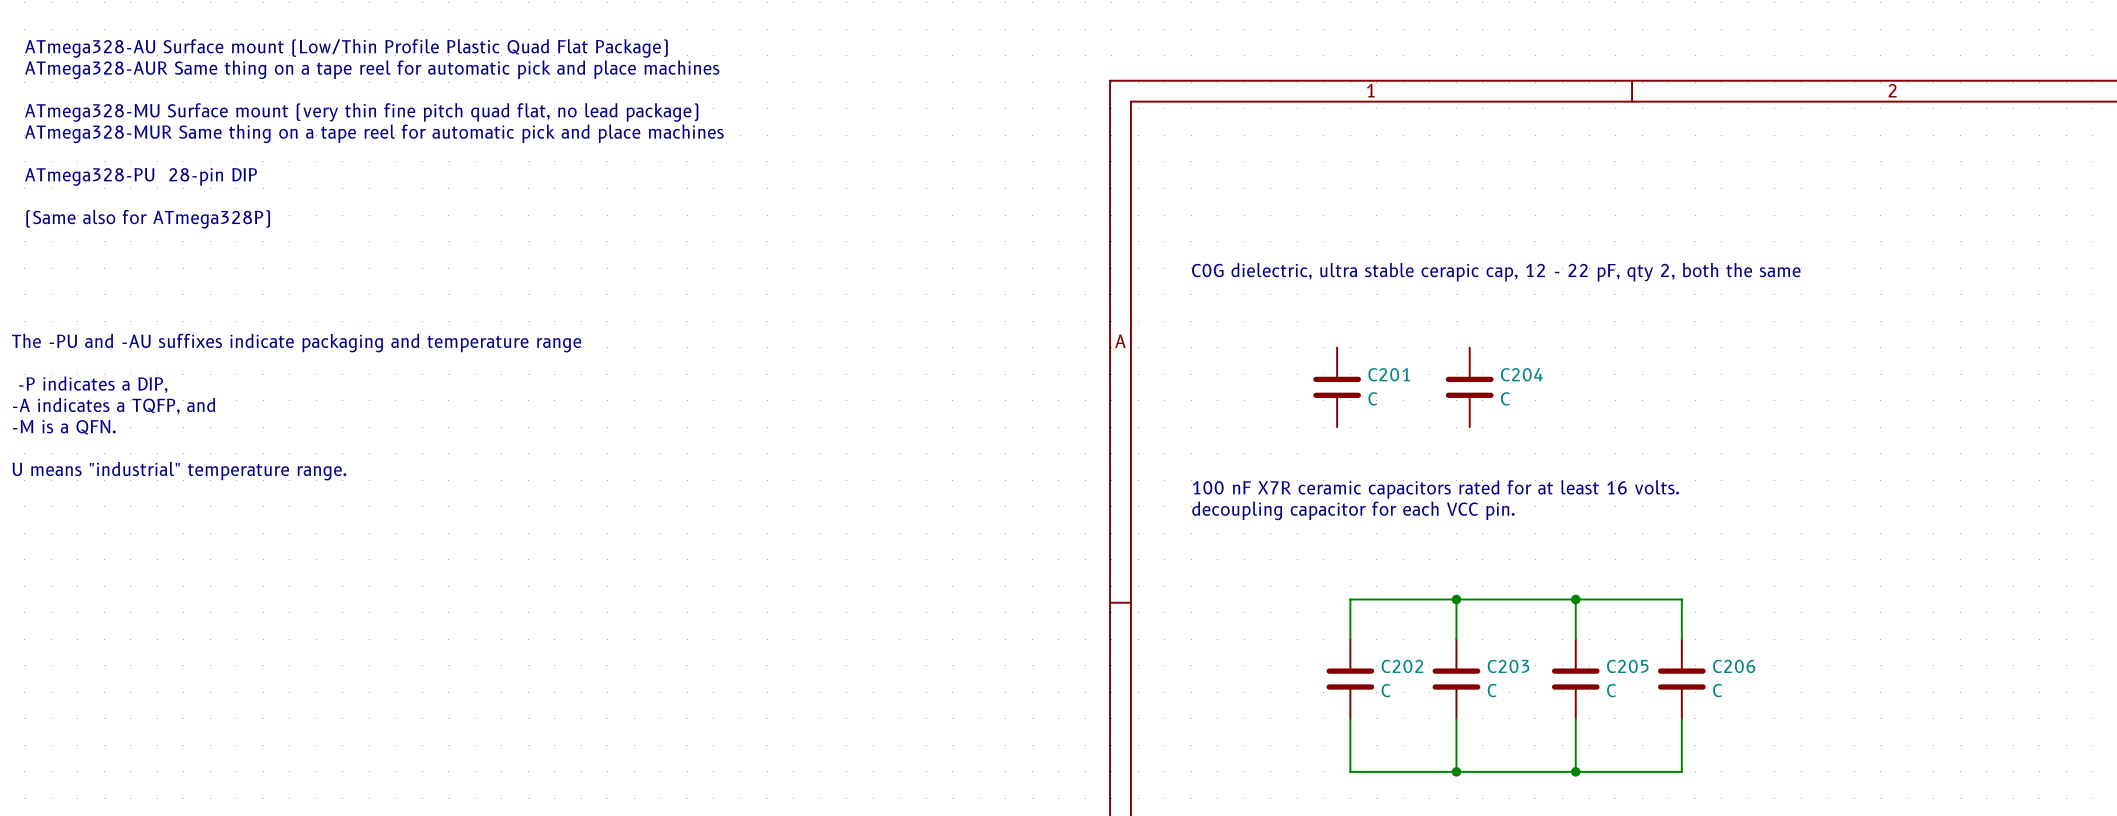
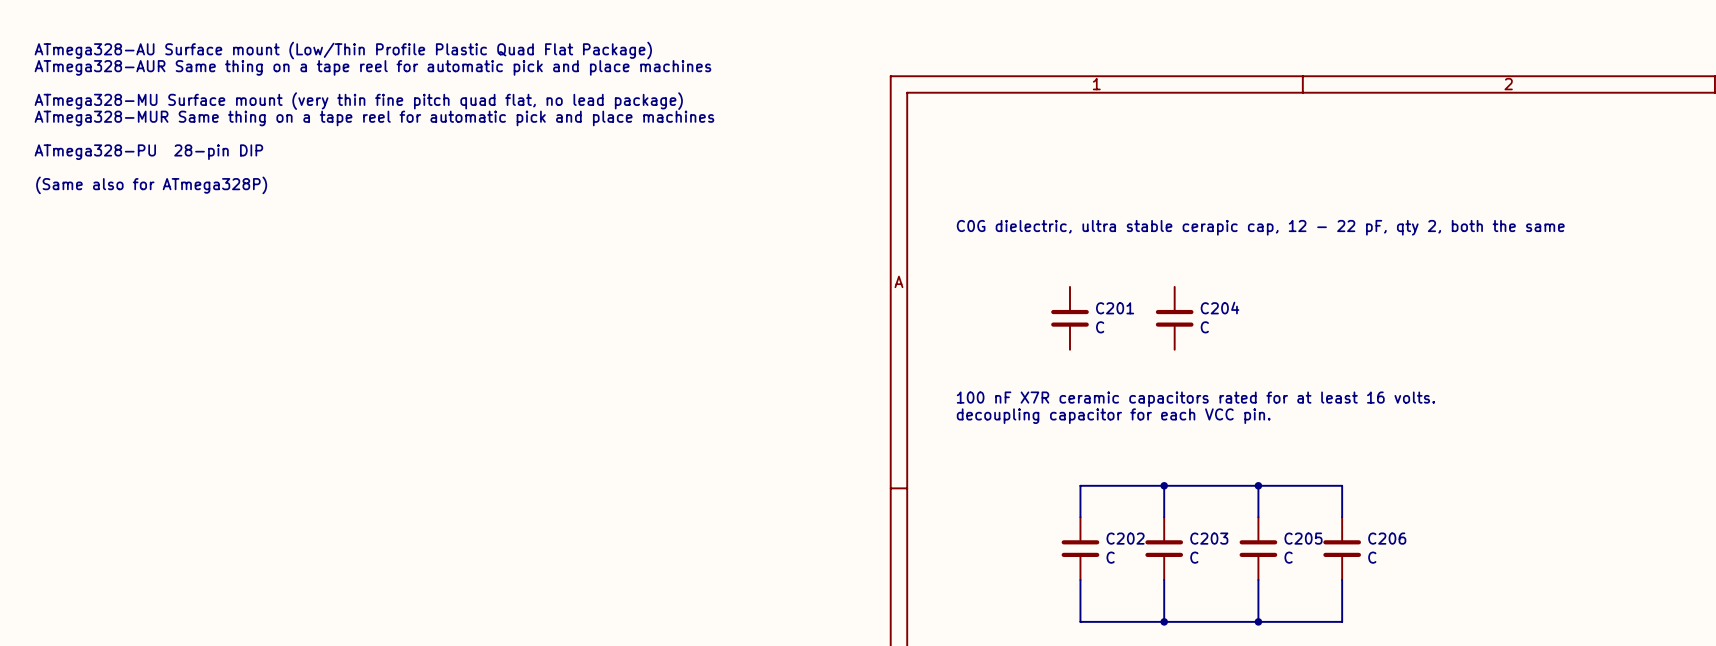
text: The -PU and -AU suffixes indicate packaging and temperature range (296, 343) -> none
text: -P indicates a DIP, (93, 384) -> none
text: -A indicates a TQFP, and (114, 406) -> none
text: -M is a QFN. (64, 427) -> none
text: U means "industrial" temperature range. (179, 471) -> none

